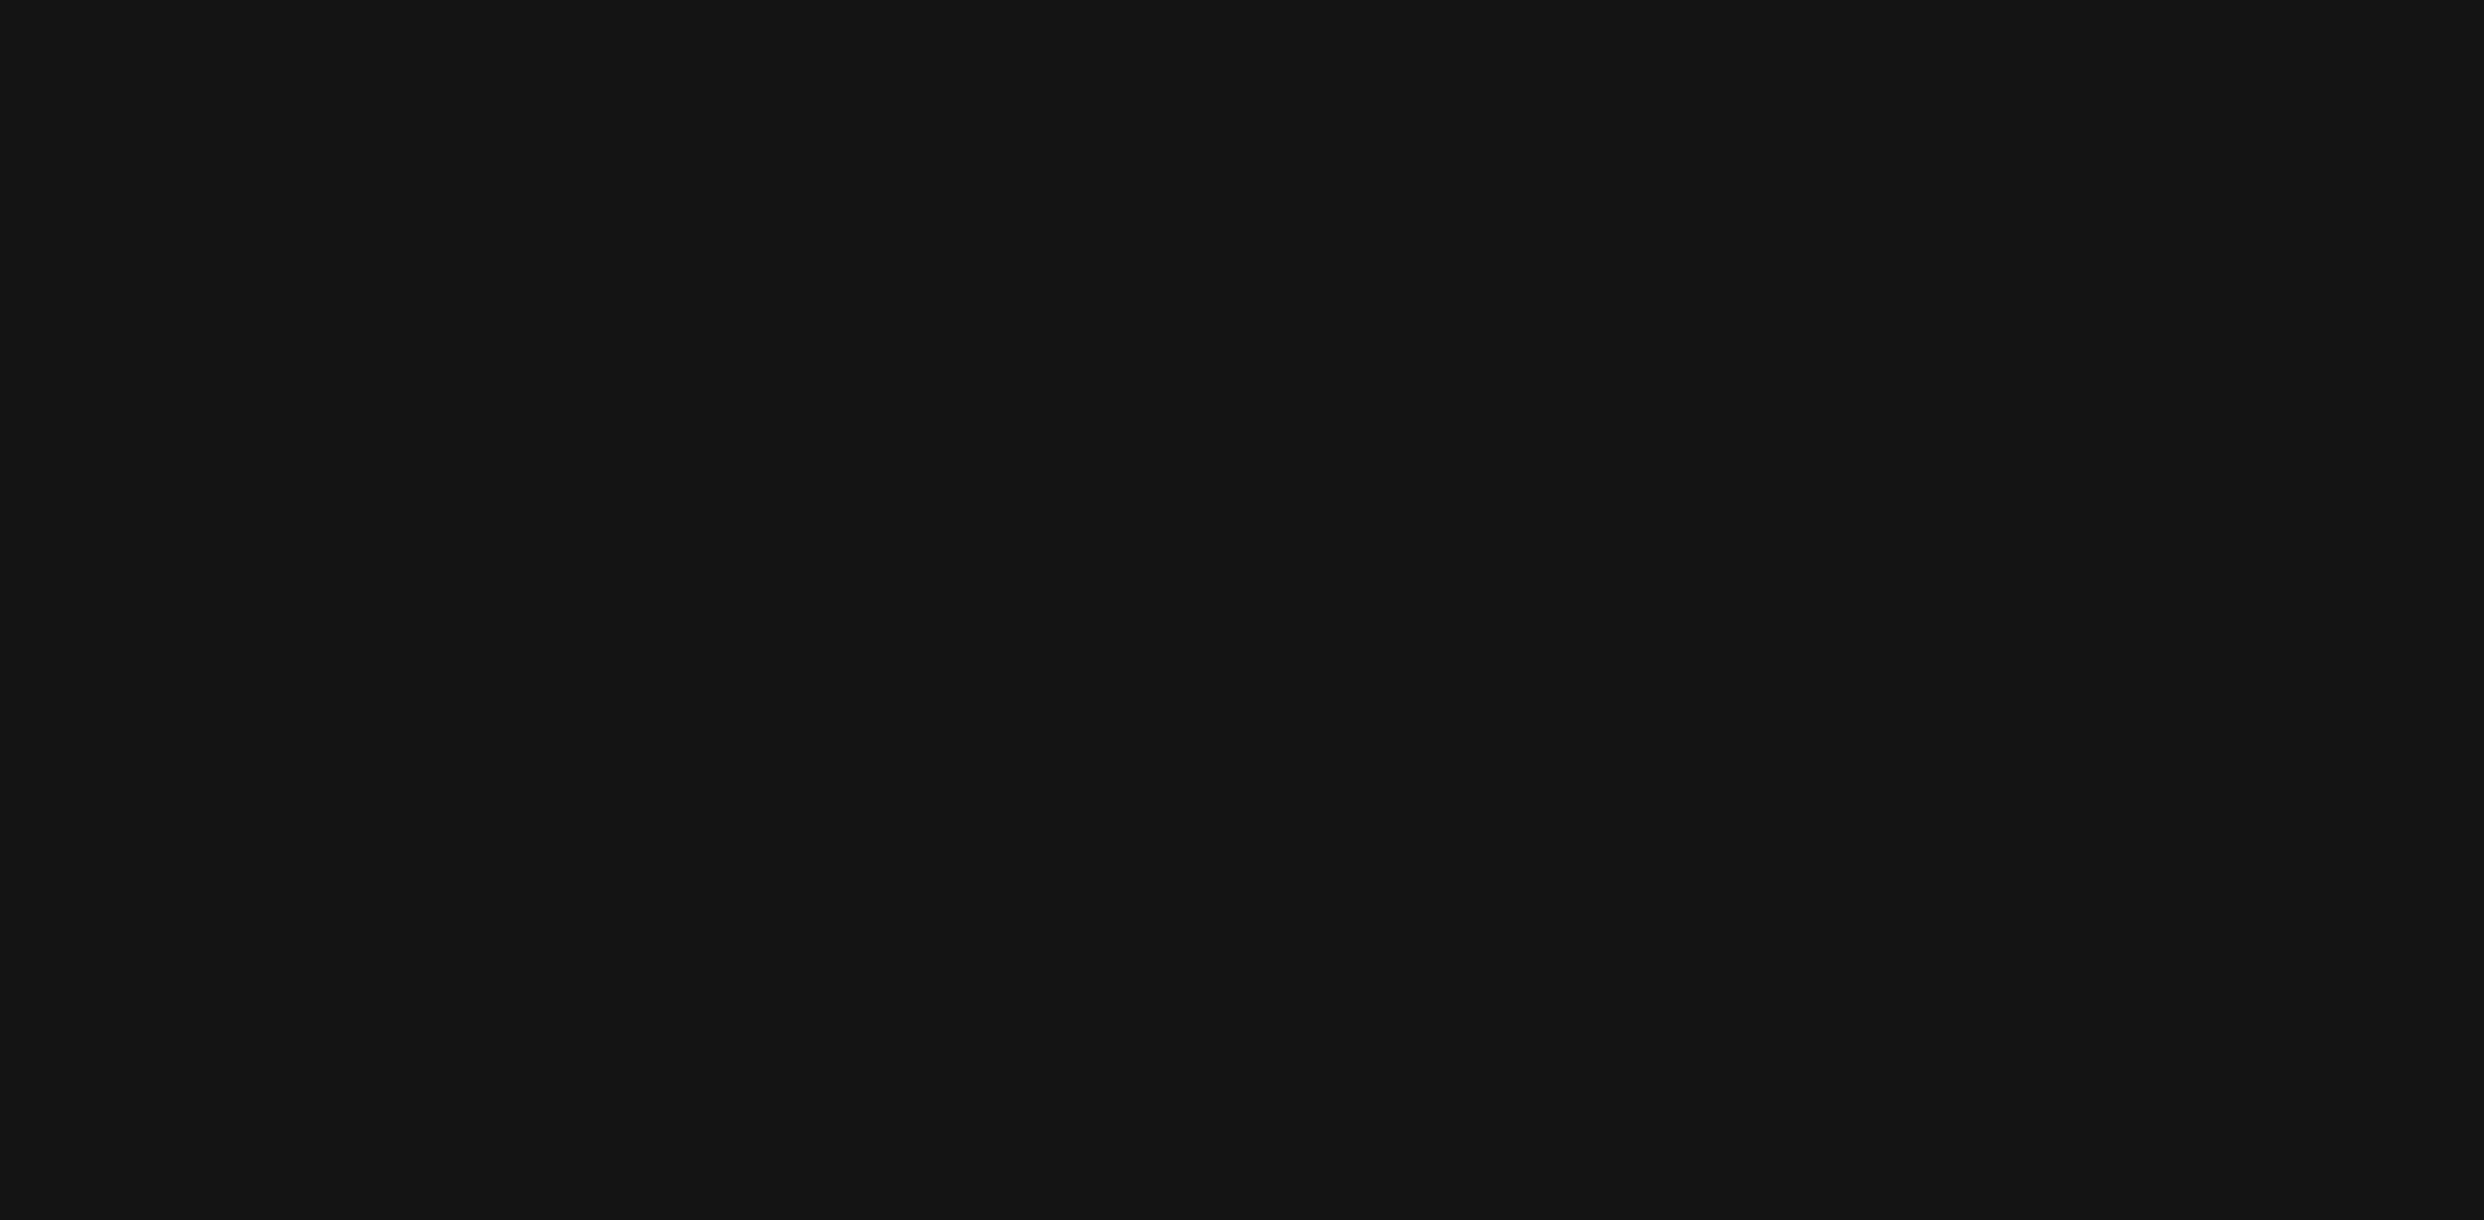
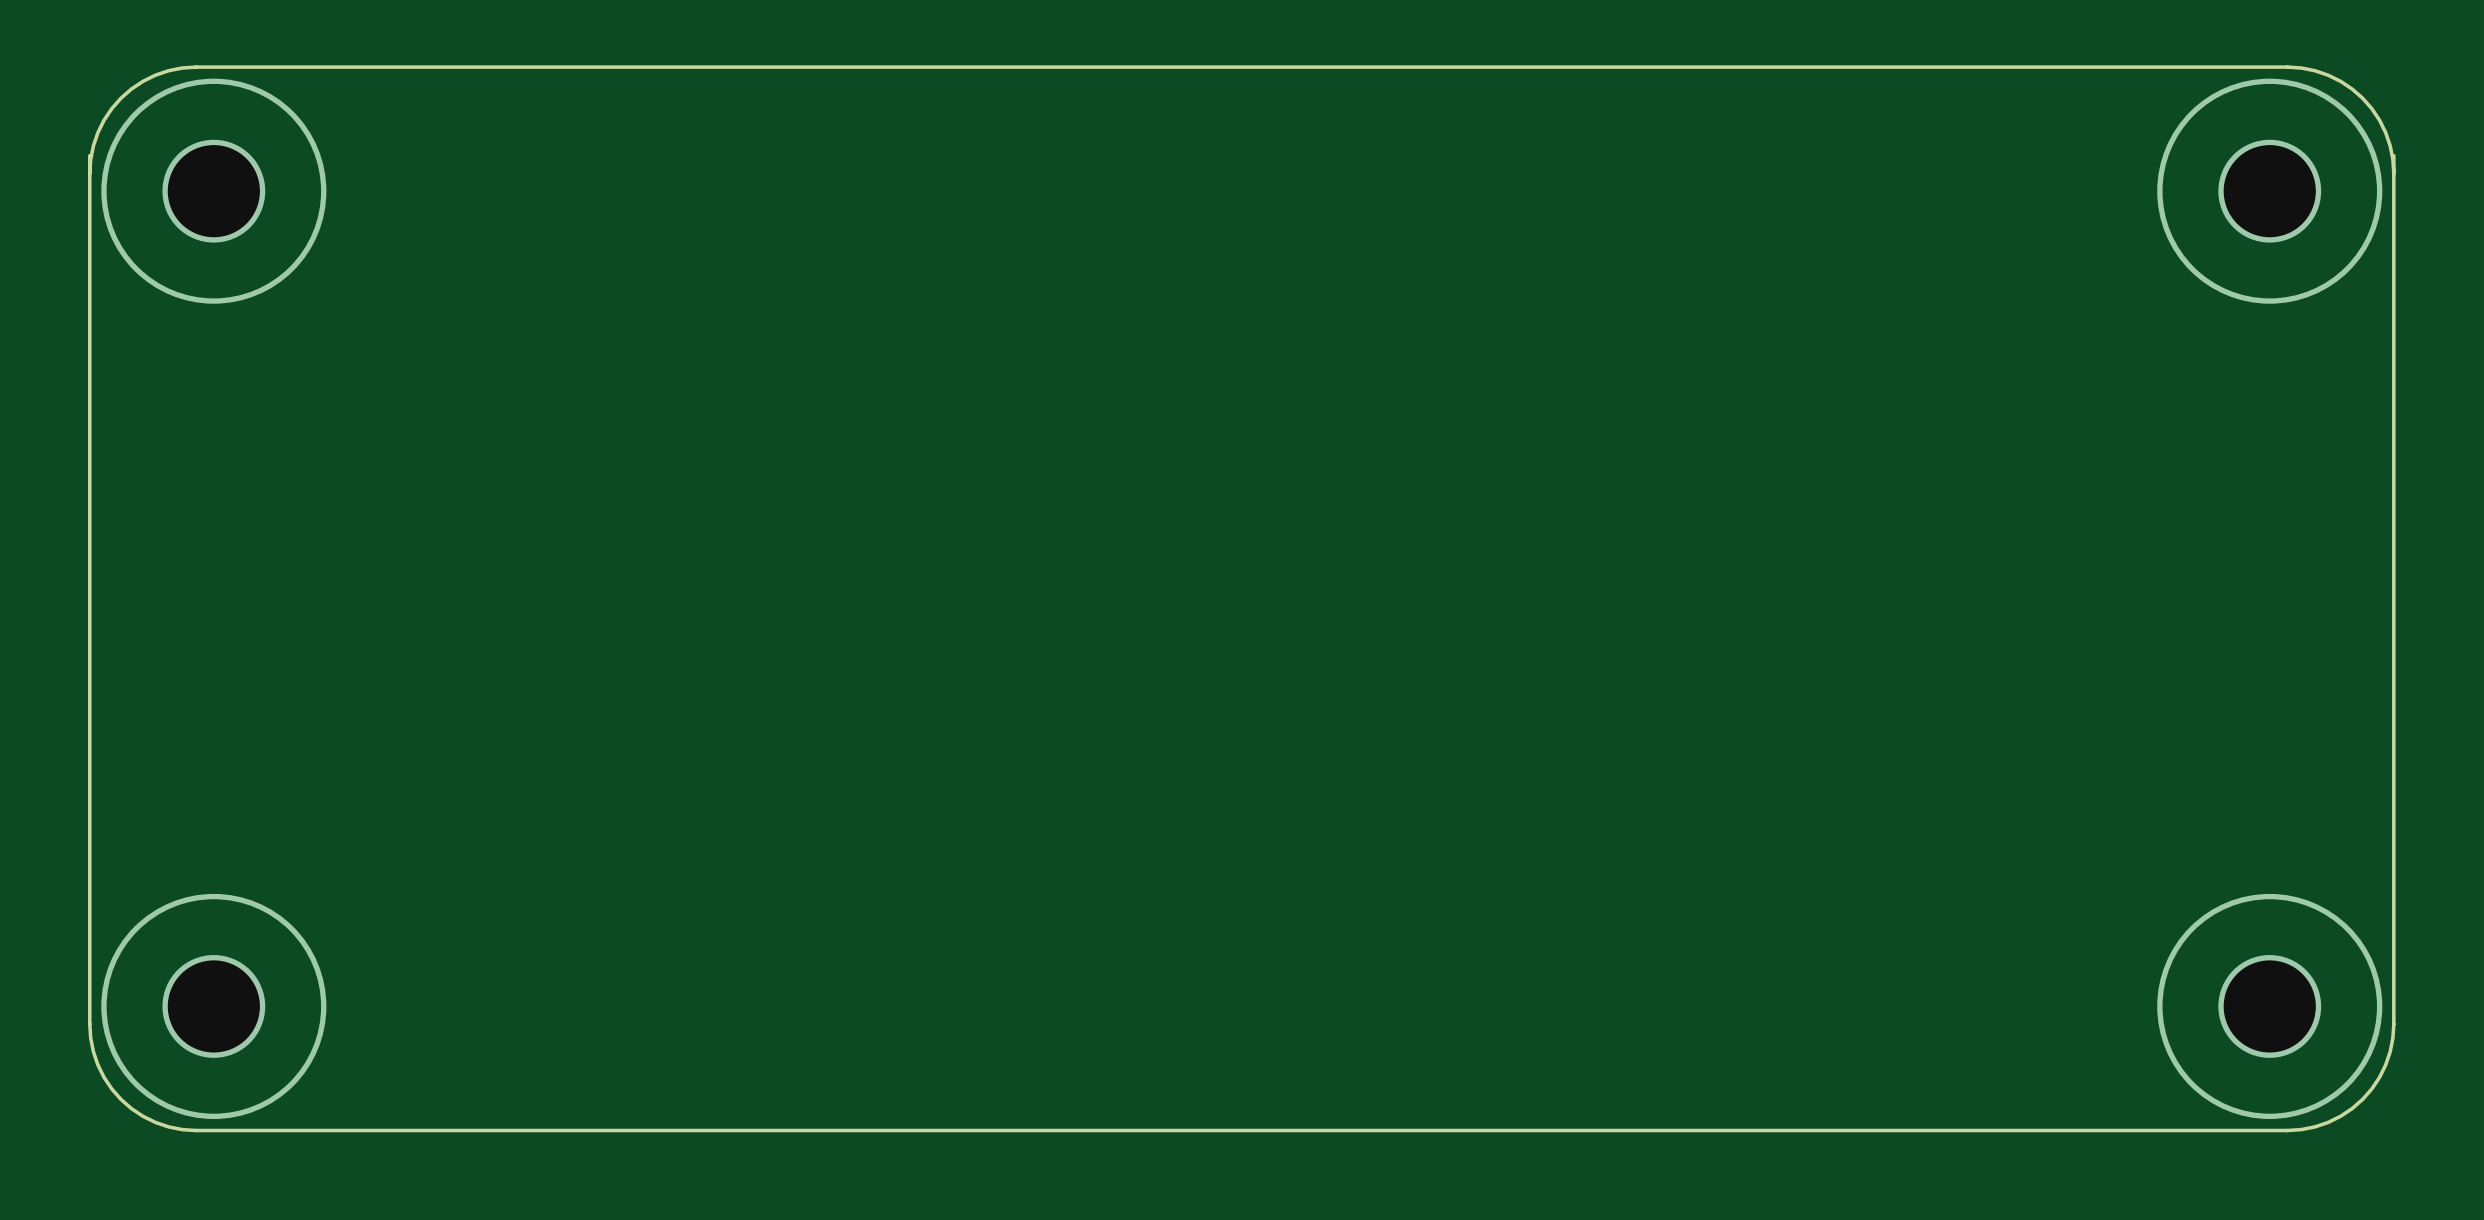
board edge: none -> (89, 155) (90, 1038) (97, 1064) (104, 1077) (120, 1099) (142, 1116) (155, 1122) (182, 1129) (196, 1130) (2287, 1130) (2301, 1129) (2328, 1122) (2352, 1108) (2371, 1088) (2385, 1064) (2392, 1038) (2393, 155)
board edge: none -> (89, 173) (93, 145) (97, 132) (104, 120) (120, 98) (142, 81) (155, 75) (182, 68) (196, 67) (2287, 67) (2301, 68) (2328, 75) (2352, 89) (2362, 98) (2371, 108) (2385, 132) (2392, 159) (2393, 173)
part: none -> (213, 191)
part: none -> (2269, 191)
part: none -> (213, 1006)
part: none -> (2269, 1006)

